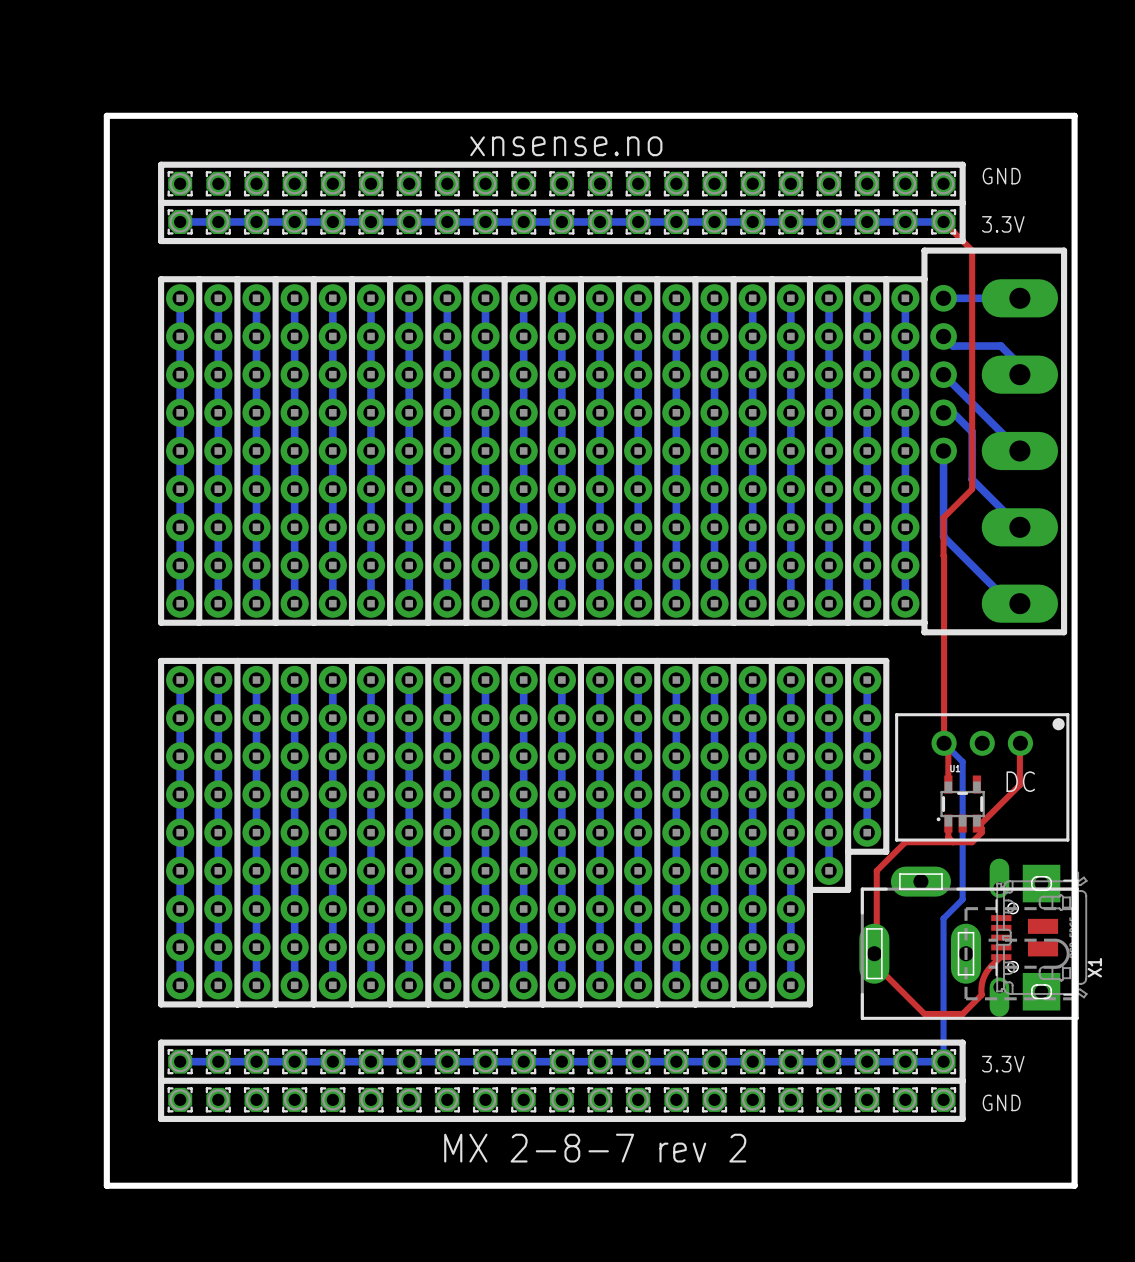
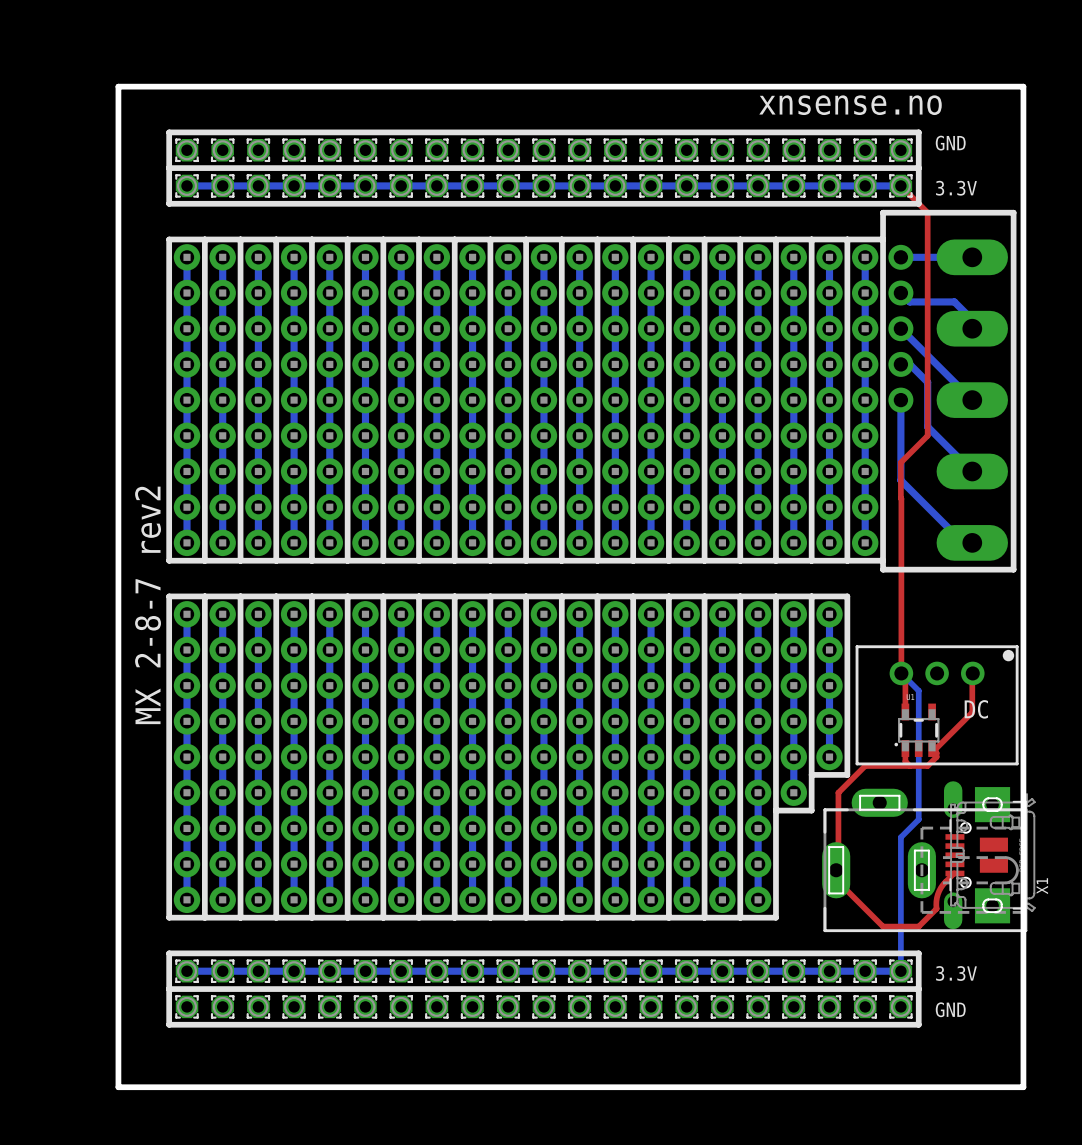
text position: xnsense.no (566, 146) -> xnsense.no (850, 105)
text: none -> MX 2-8-7 rev2 (148, 605)
text: MX 2-8-7 rev 2 (595, 1148) -> none

